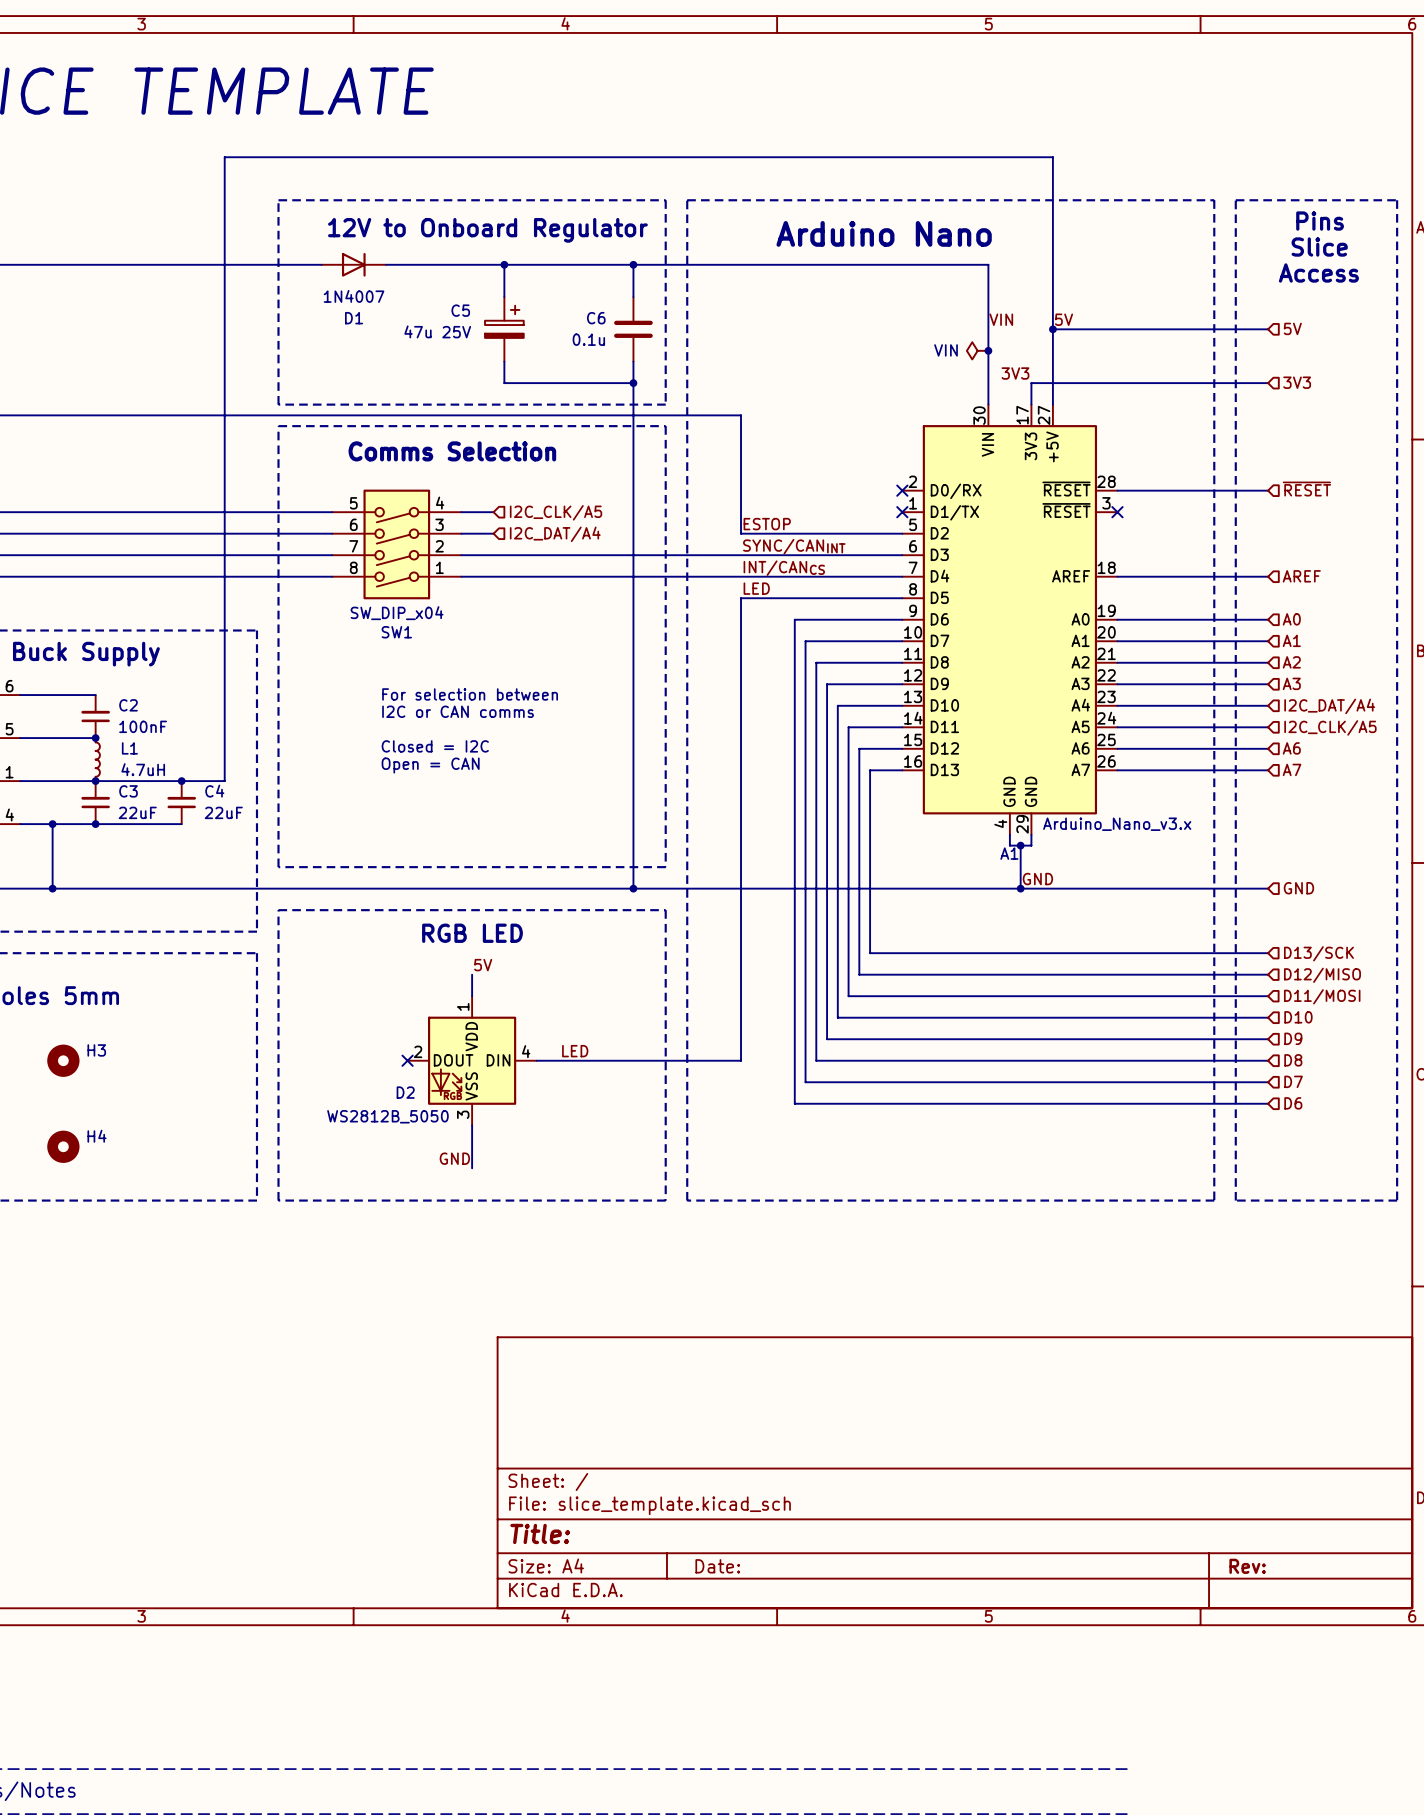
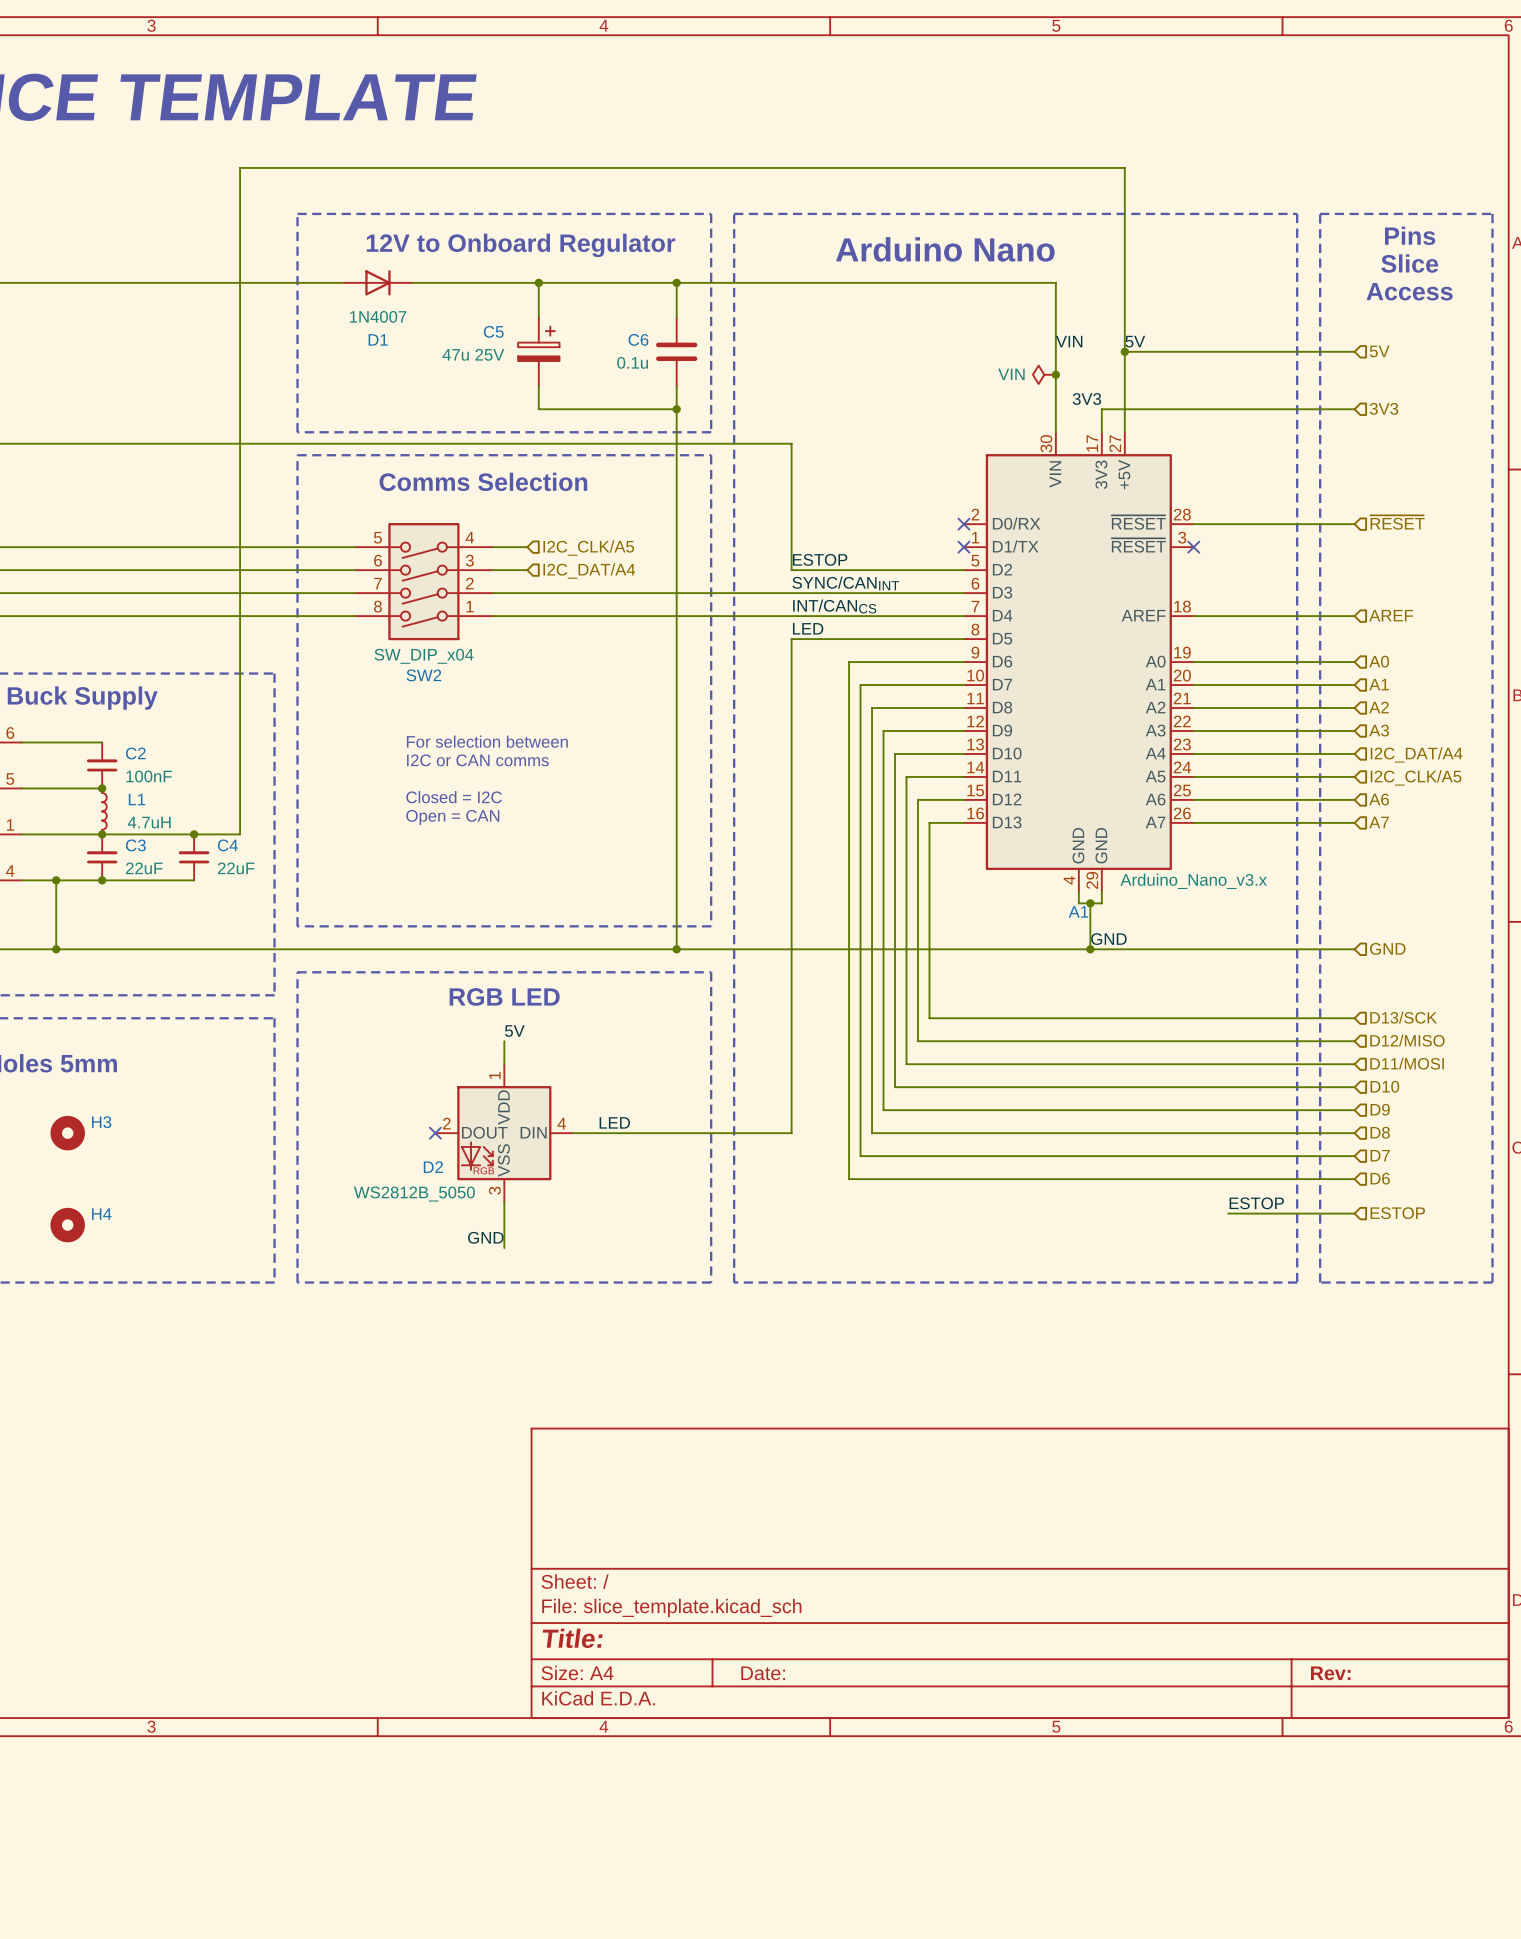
SW1 name: SW1 (396, 632) -> SW2 (423, 675)
label: none -> ESTOP (1256, 1203)
hierarchical label: none -> ESTOP (1397, 1213)
wire: none -> (1228, 1213) (1354, 1213)

